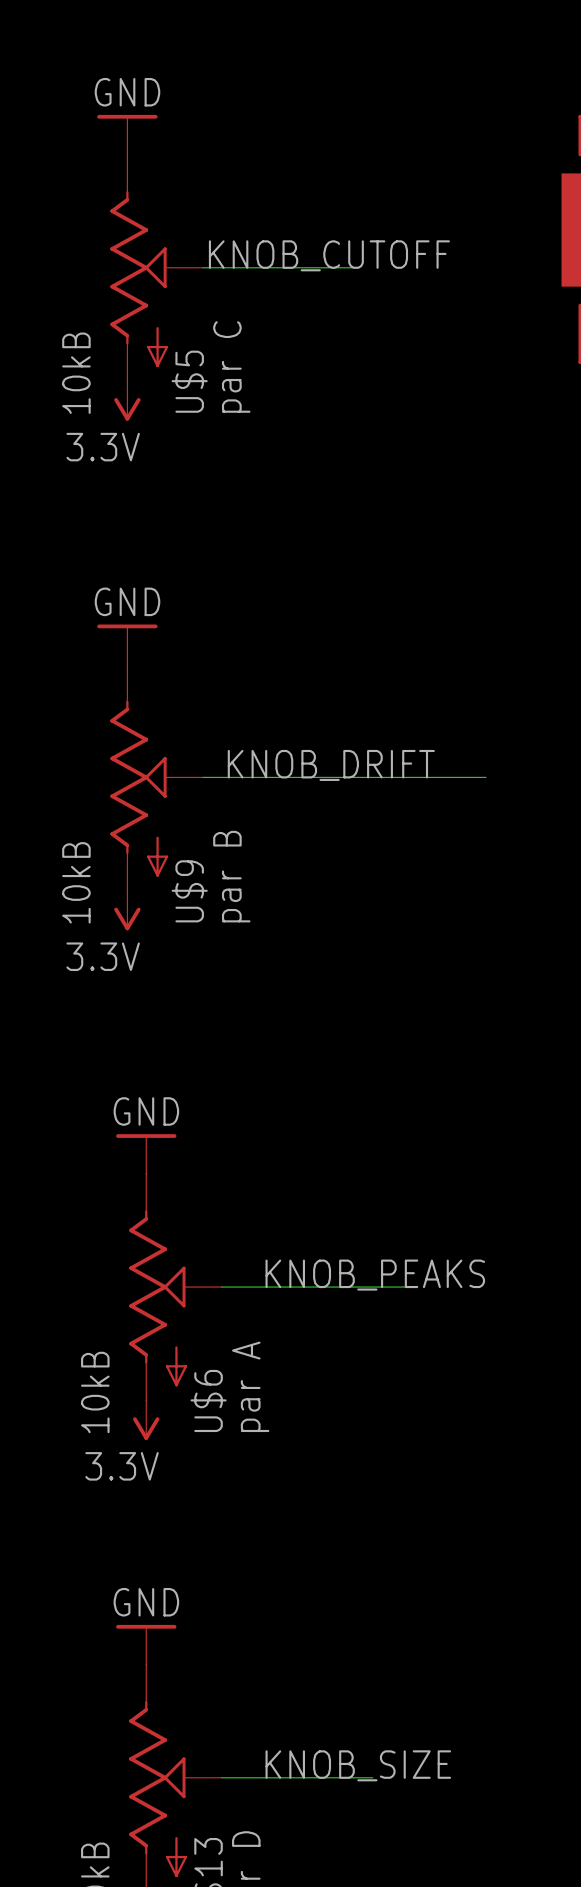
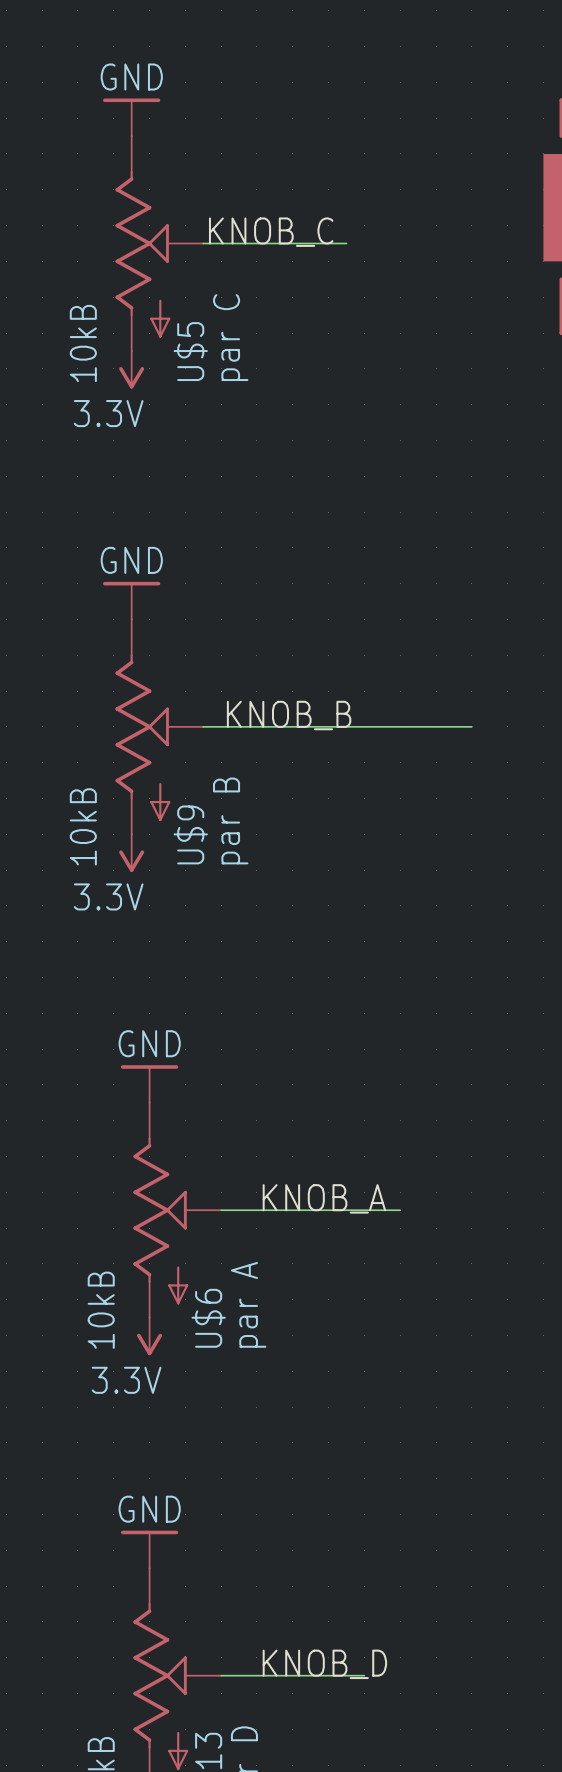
label: KNOB_CUTOFF (329, 255) -> KNOB_C (271, 232)
label: KNOB_DRIFT (331, 765) -> KNOB_B (289, 715)
label: KNOB_PEAKS (375, 1275) -> KNOB_A (324, 1198)
label: KNOB_SIZE (358, 1765) -> KNOB_D (324, 1664)

